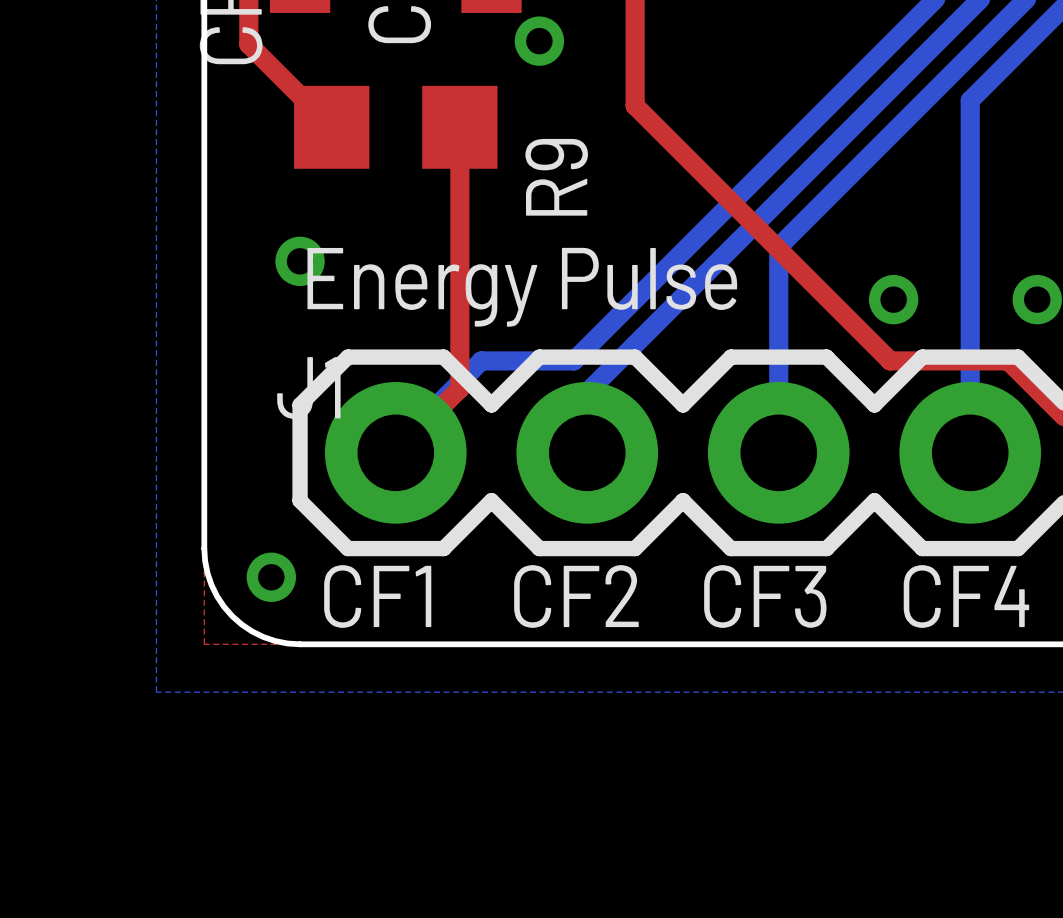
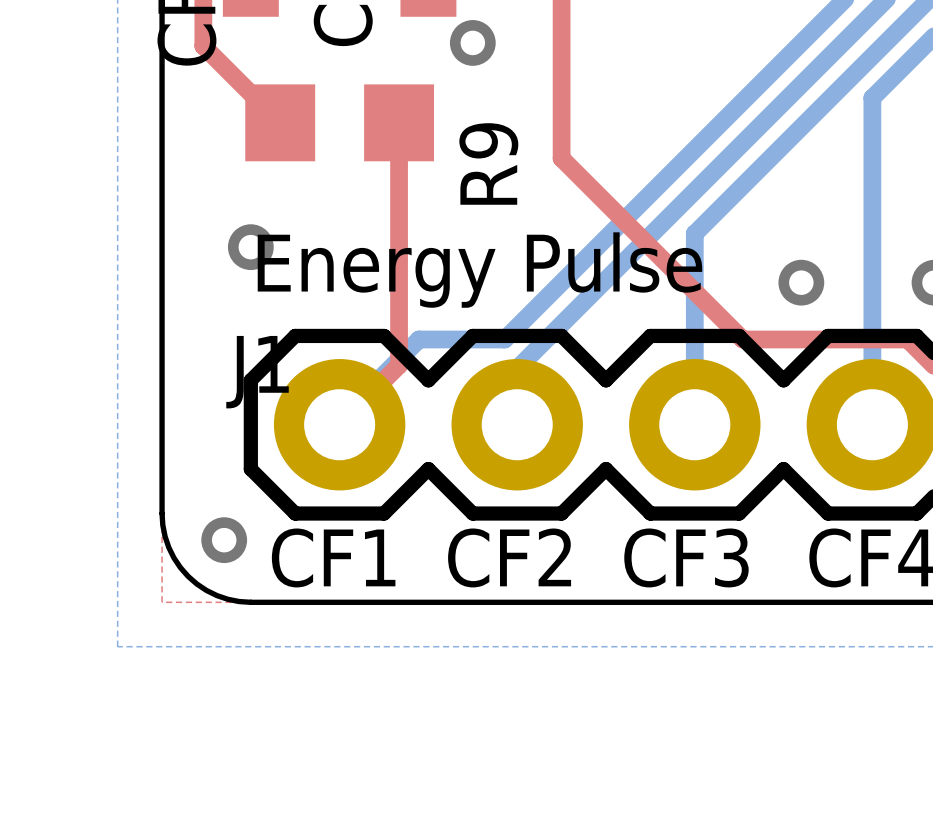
top track: (635, 105) (890, 360) -> (561, 102) (561, 158) (742, 339) (798, 339)

